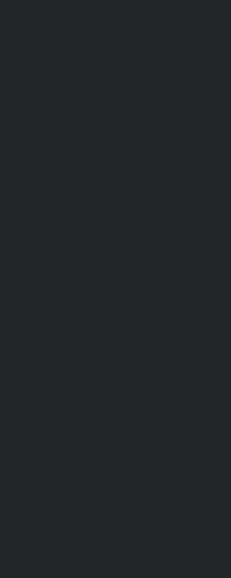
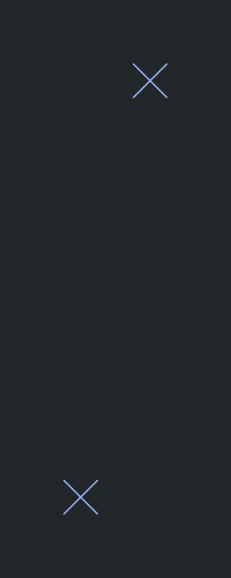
no-connect mark: none -> (150, 80)
no-connect mark: none -> (80, 497)

